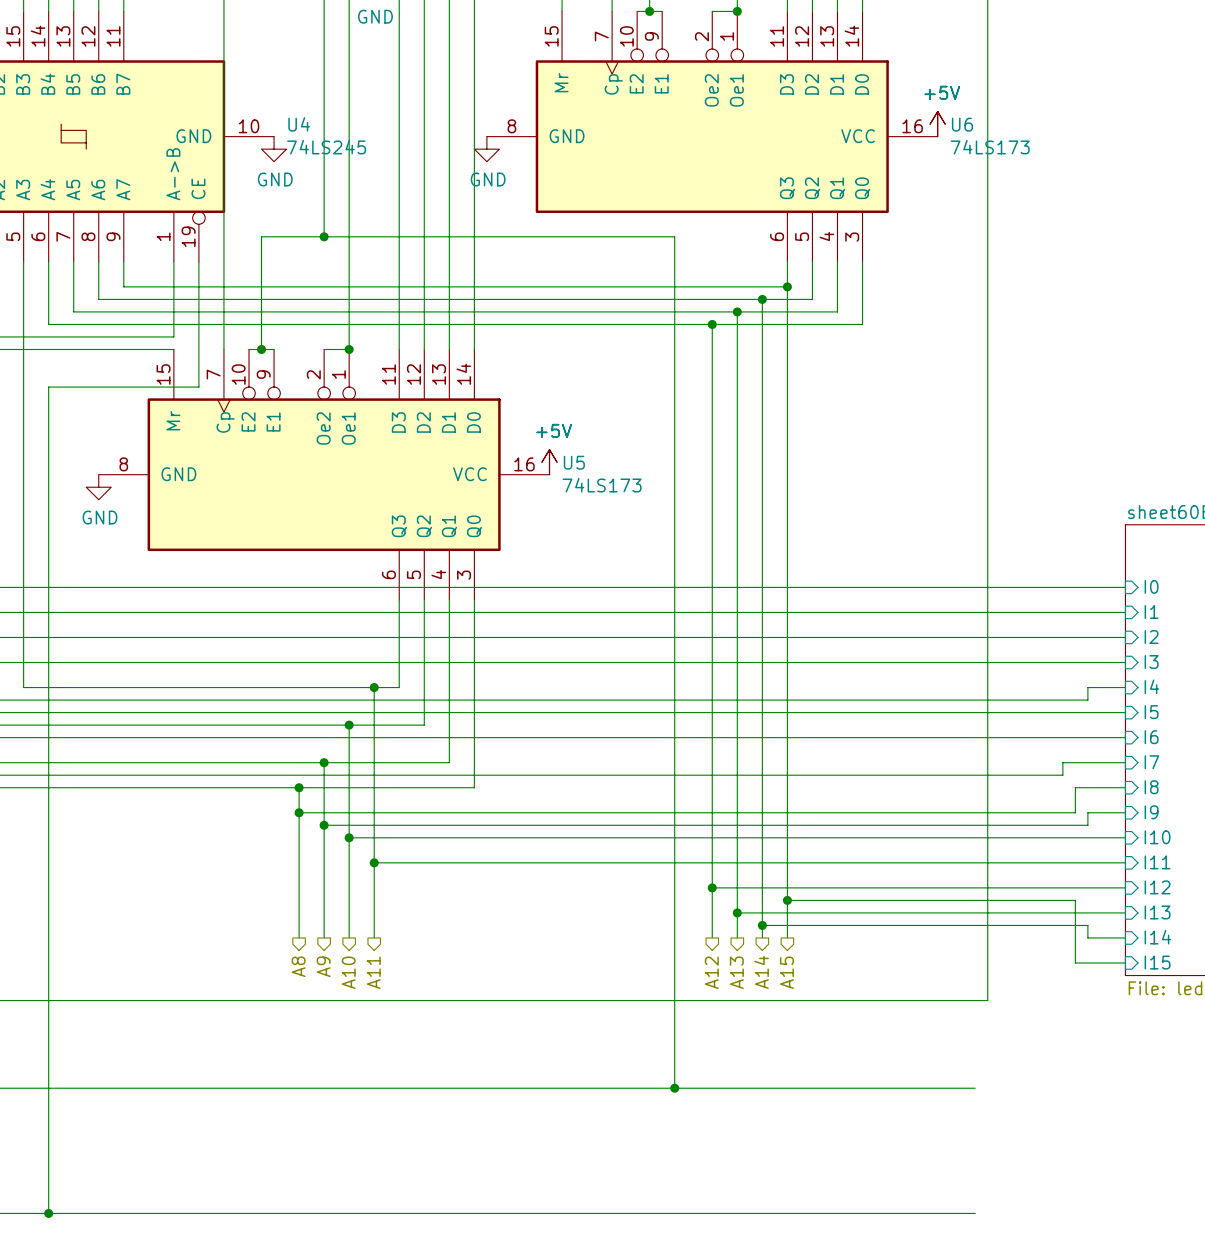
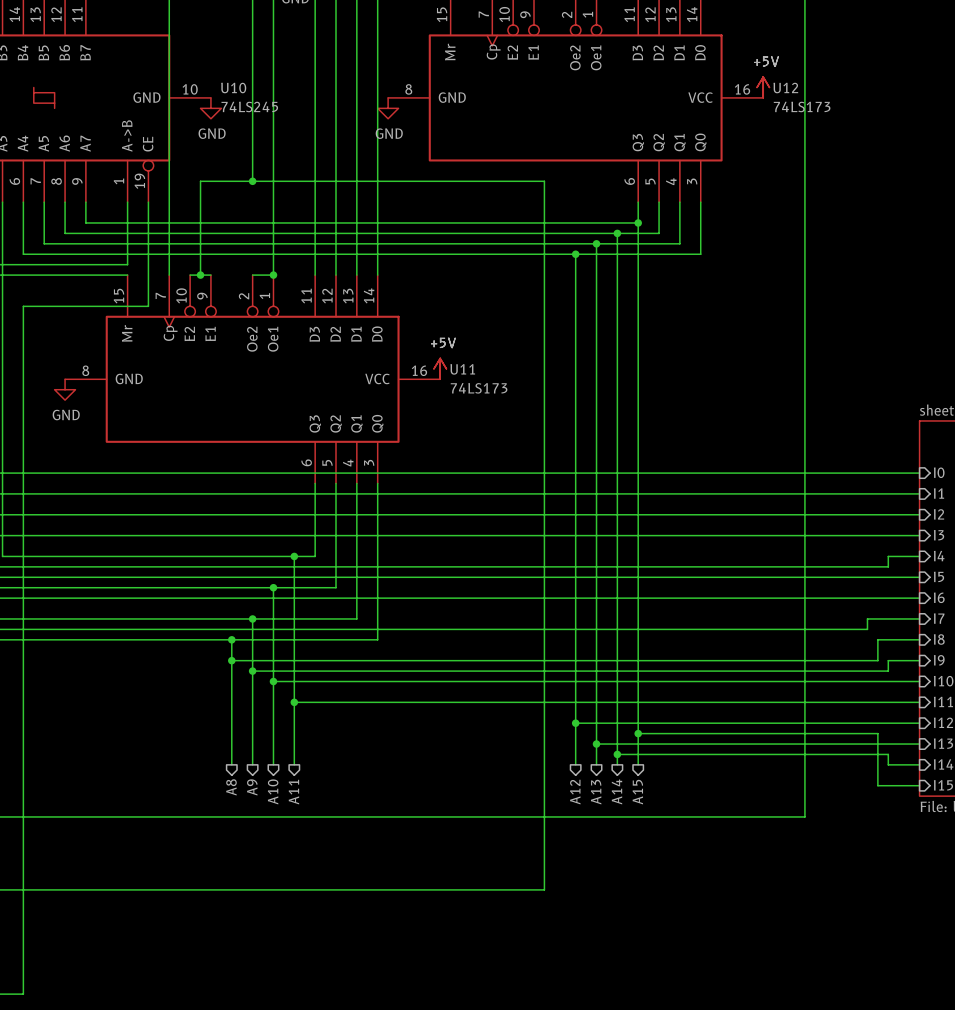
U4 name: U4 (299, 124) -> U10 (233, 88)
U6 name: U6 (962, 124) -> U12 (785, 88)
U5 name: U5 (574, 462) -> U11 (462, 369)
wire: (674, 1088) (975, 1088) -> none
junction: (674, 1088) -> none
wire: (48, 1213) (975, 1213) -> none
junction: (48, 1213) -> none

